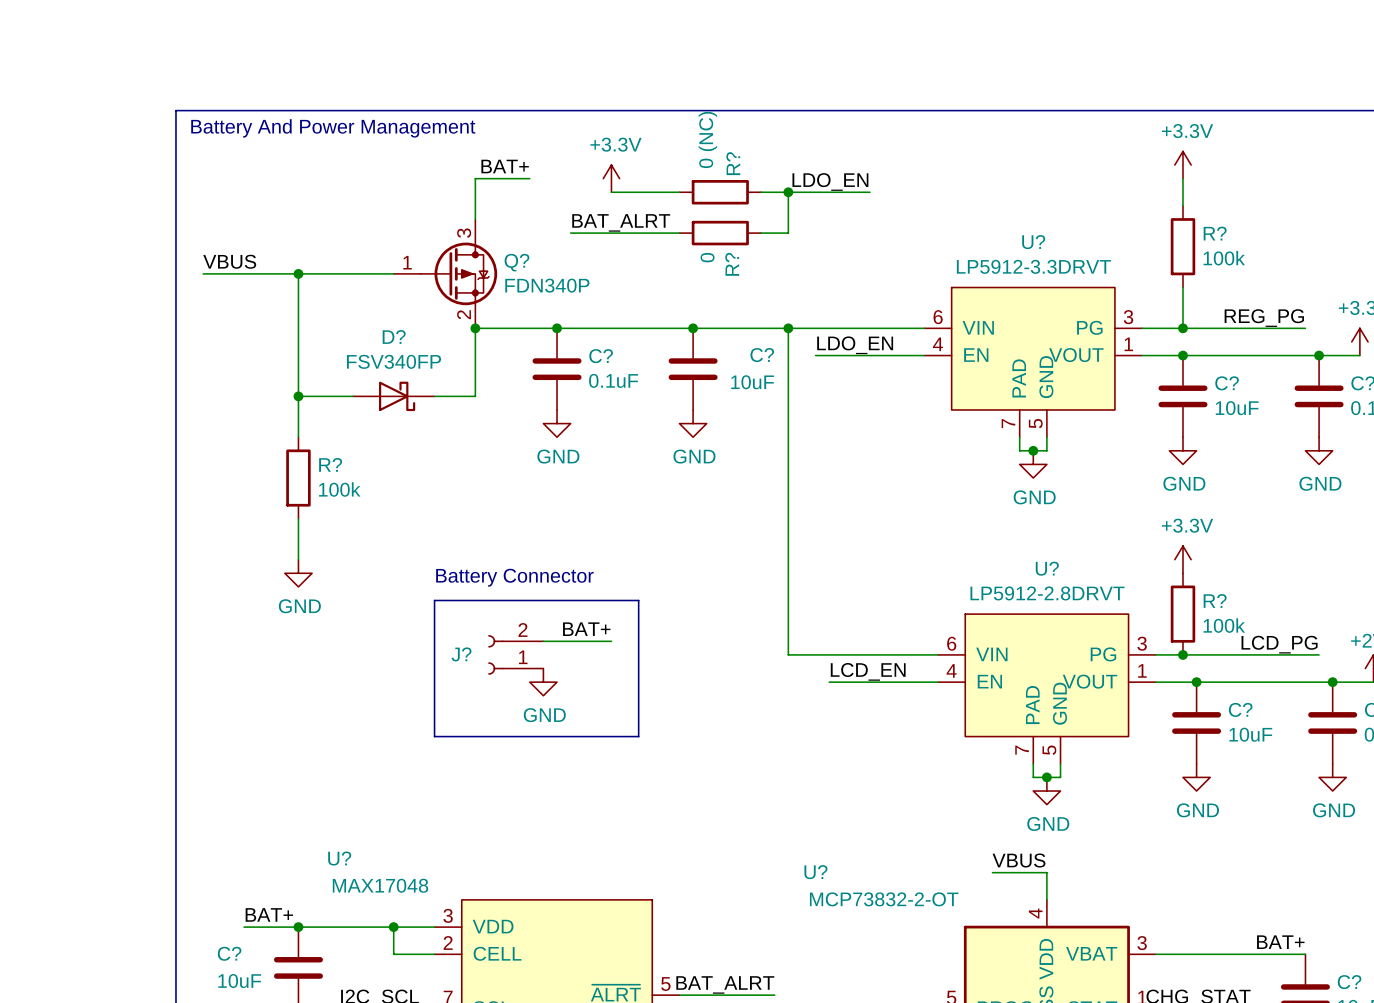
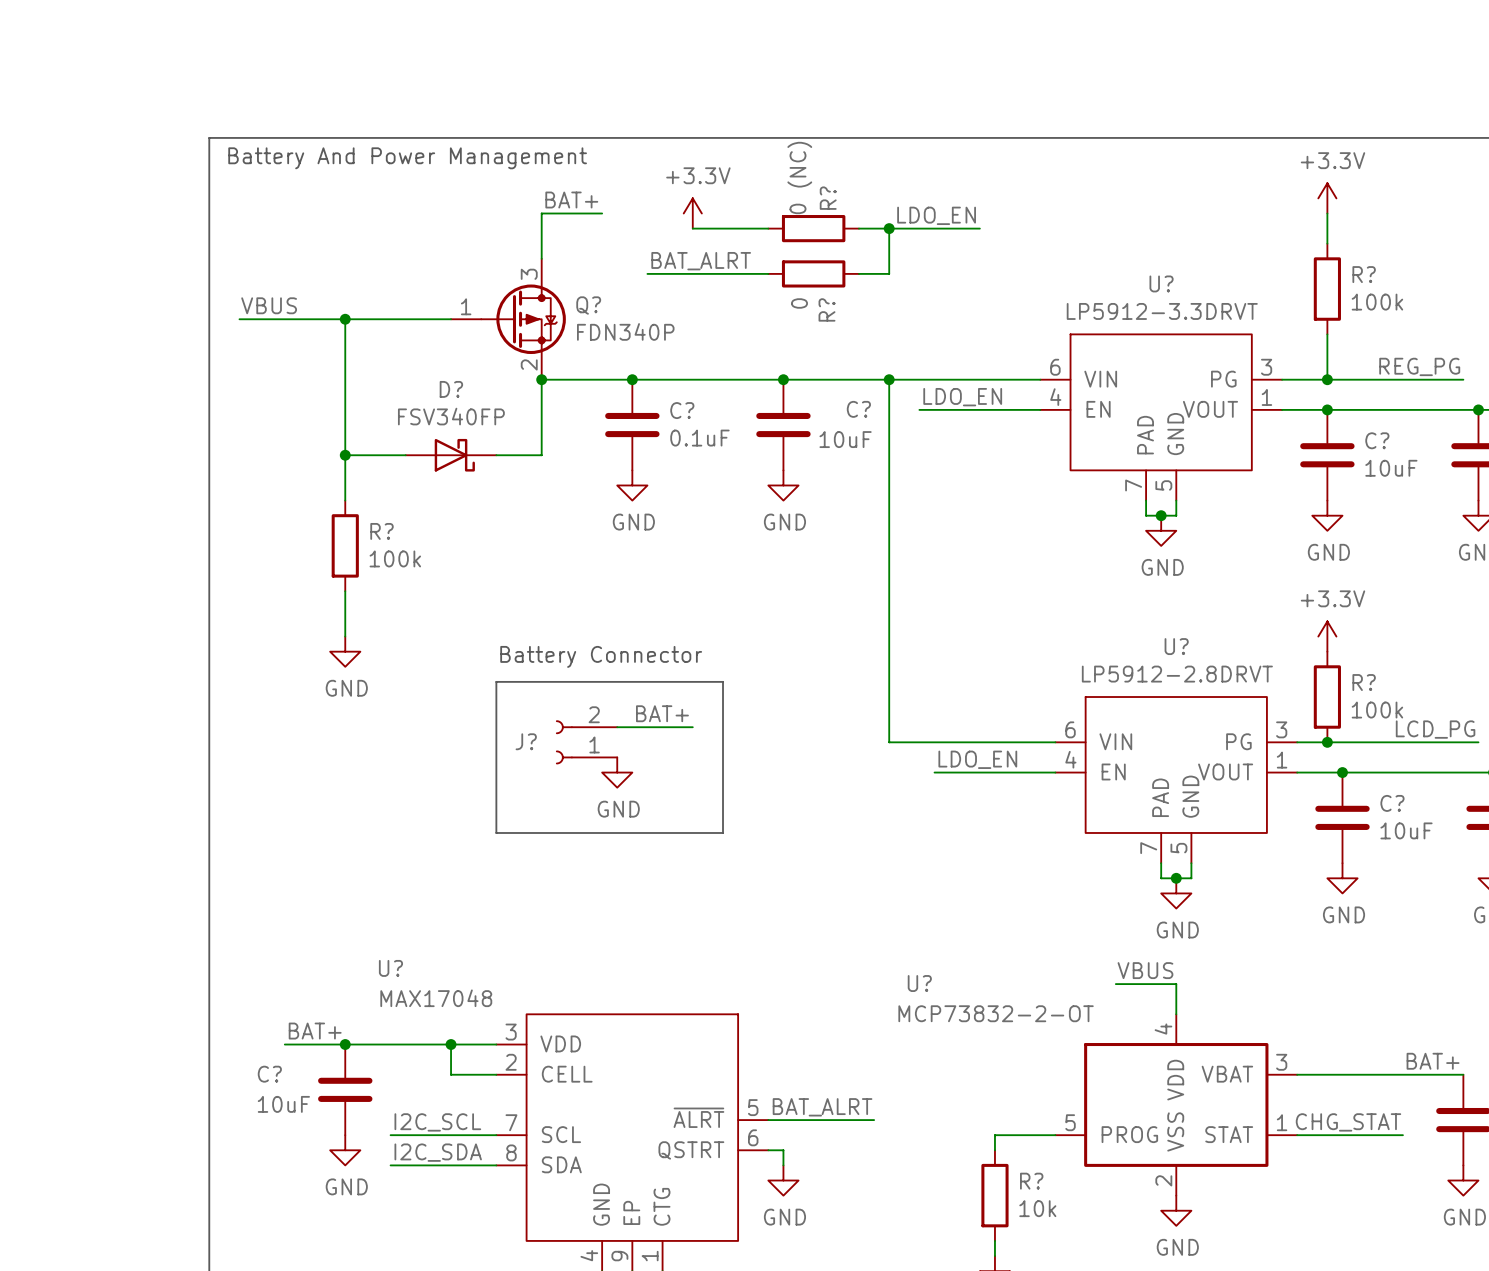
label: LCD_EN (868, 671) -> LDO_EN (977, 759)

